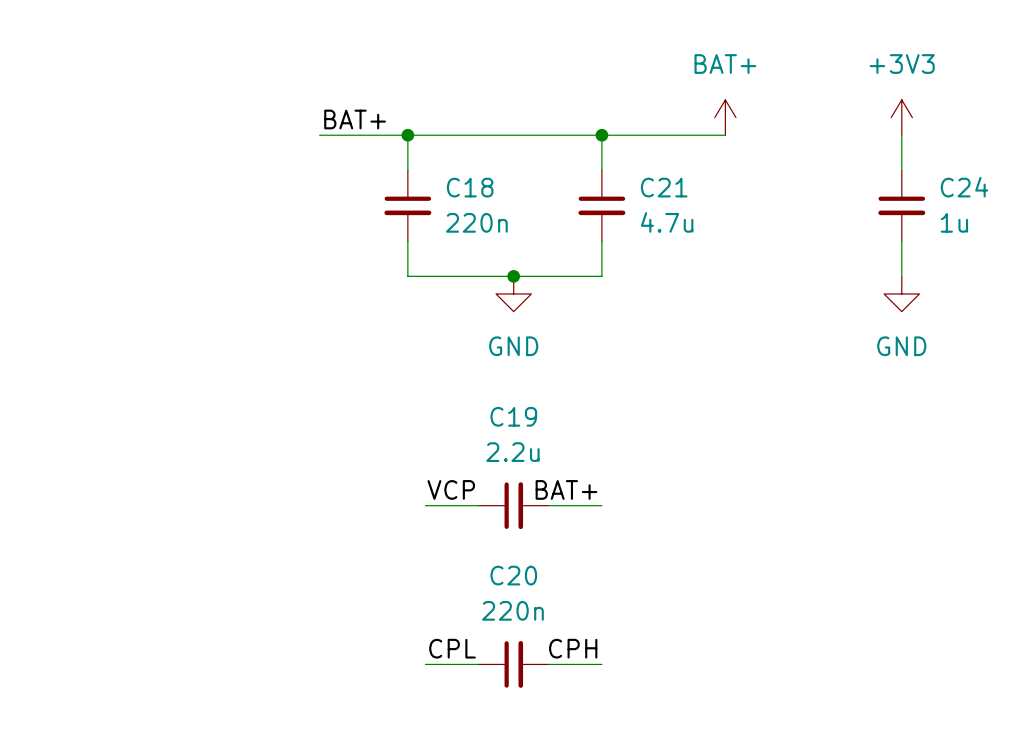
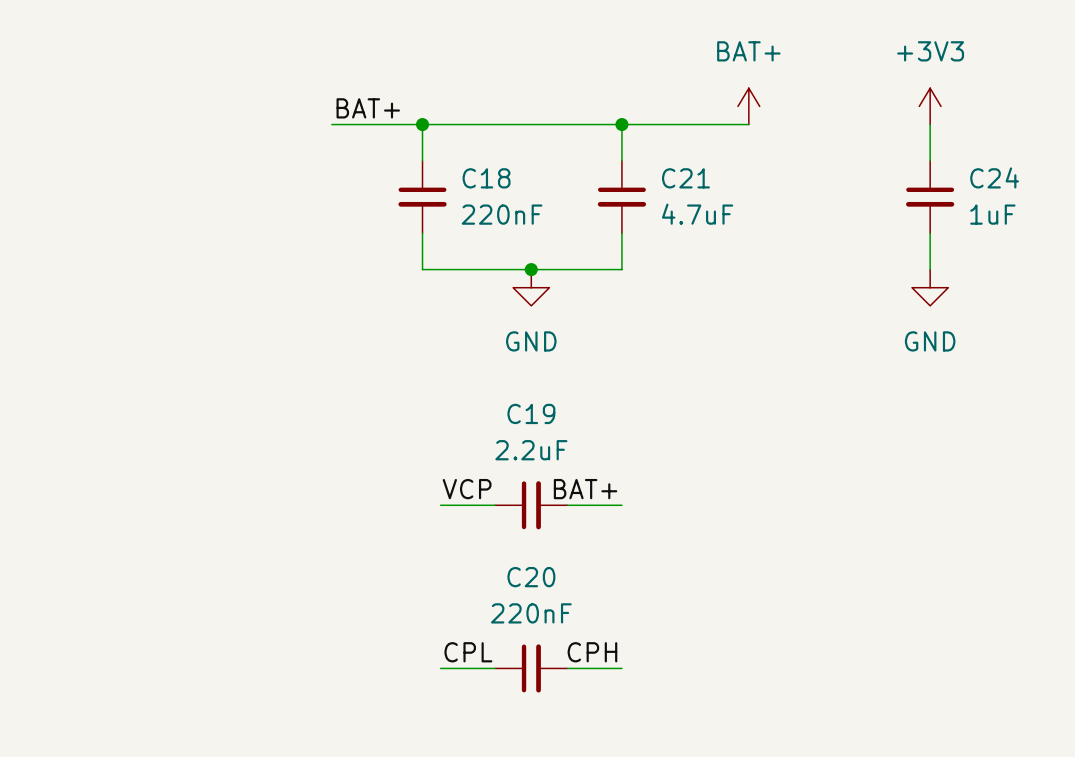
C18 value: 220n (476, 222) -> 220nF (502, 214)
C21 value: 4.7u (667, 222) -> 4.7uF (697, 214)
C24 value: 1u (954, 222) -> 1uF (992, 214)
C19 value: 2.2u (512, 452) -> 2.2uF (531, 450)
C20 value: 220n (512, 610) -> 220nF (531, 613)

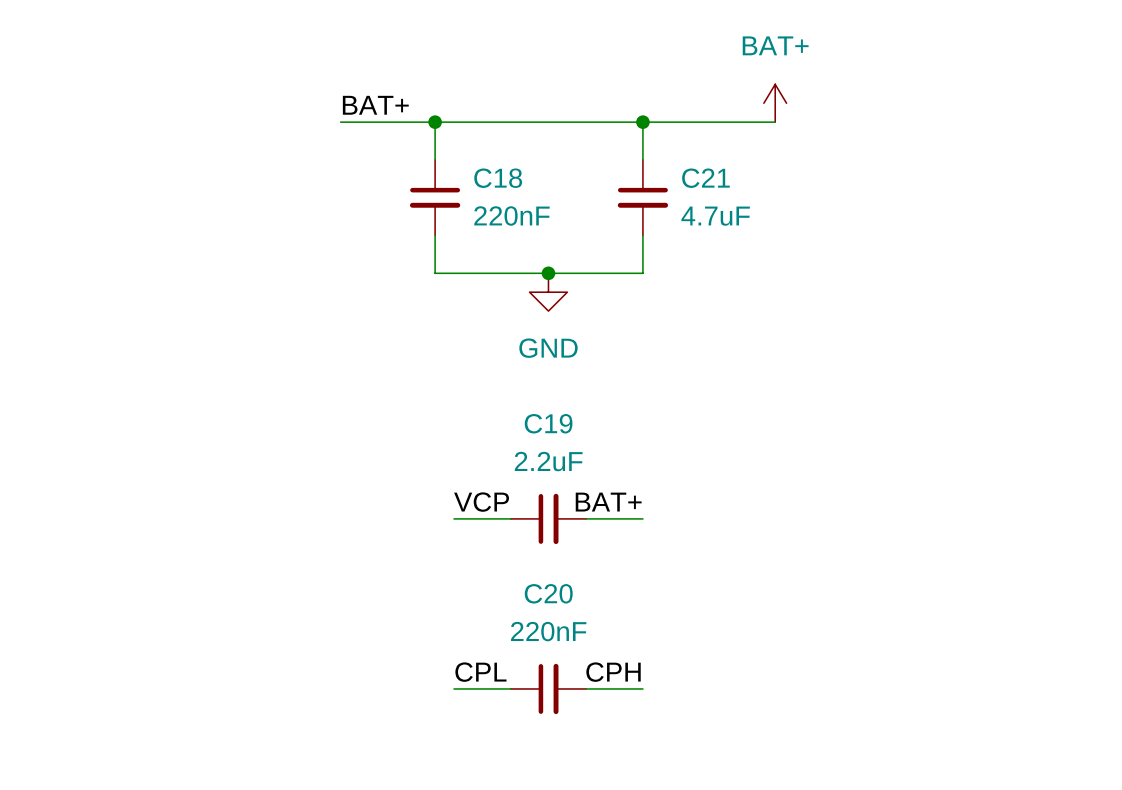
power symbol: +3V3 (930, 106) -> none
wire: (930, 124) (930, 160) -> none
C24: 1uF (930, 197) -> none
wire: (930, 233) (930, 269) -> none
power symbol: GND (930, 287) -> none

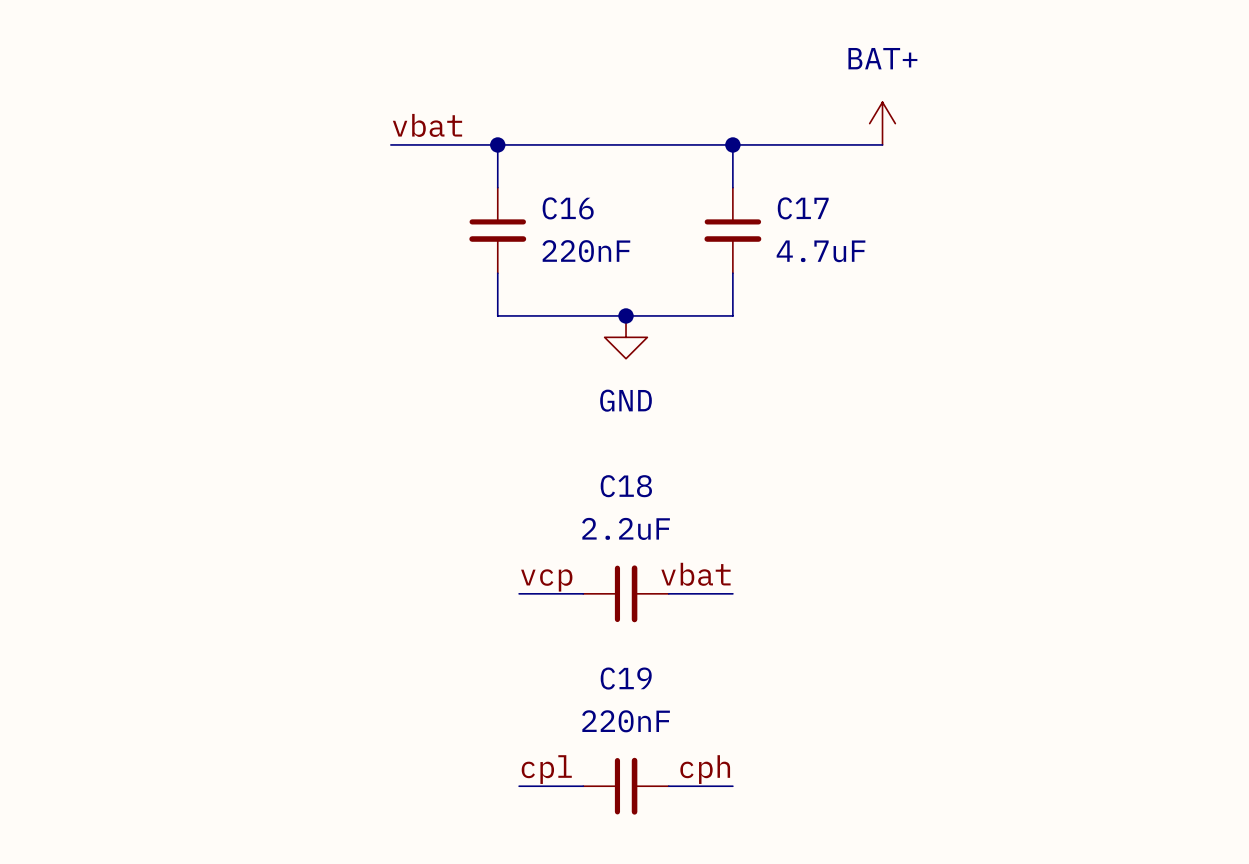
label: BAT+ (375, 105) -> vbat (427, 125)
C18 name: C18 (498, 178) -> C16 (568, 208)
C21 name: C21 (705, 178) -> C17 (803, 208)
C19 name: C19 (548, 423) -> C18 (626, 486)
label: VCP (481, 502) -> vcp (546, 580)
label: BAT+ (608, 502) -> vbat (695, 574)
C20 name: C20 (548, 593) -> C19 (626, 678)
label: CPL (480, 672) -> cpl (546, 769)
label: CPH (613, 672) -> cph (705, 769)

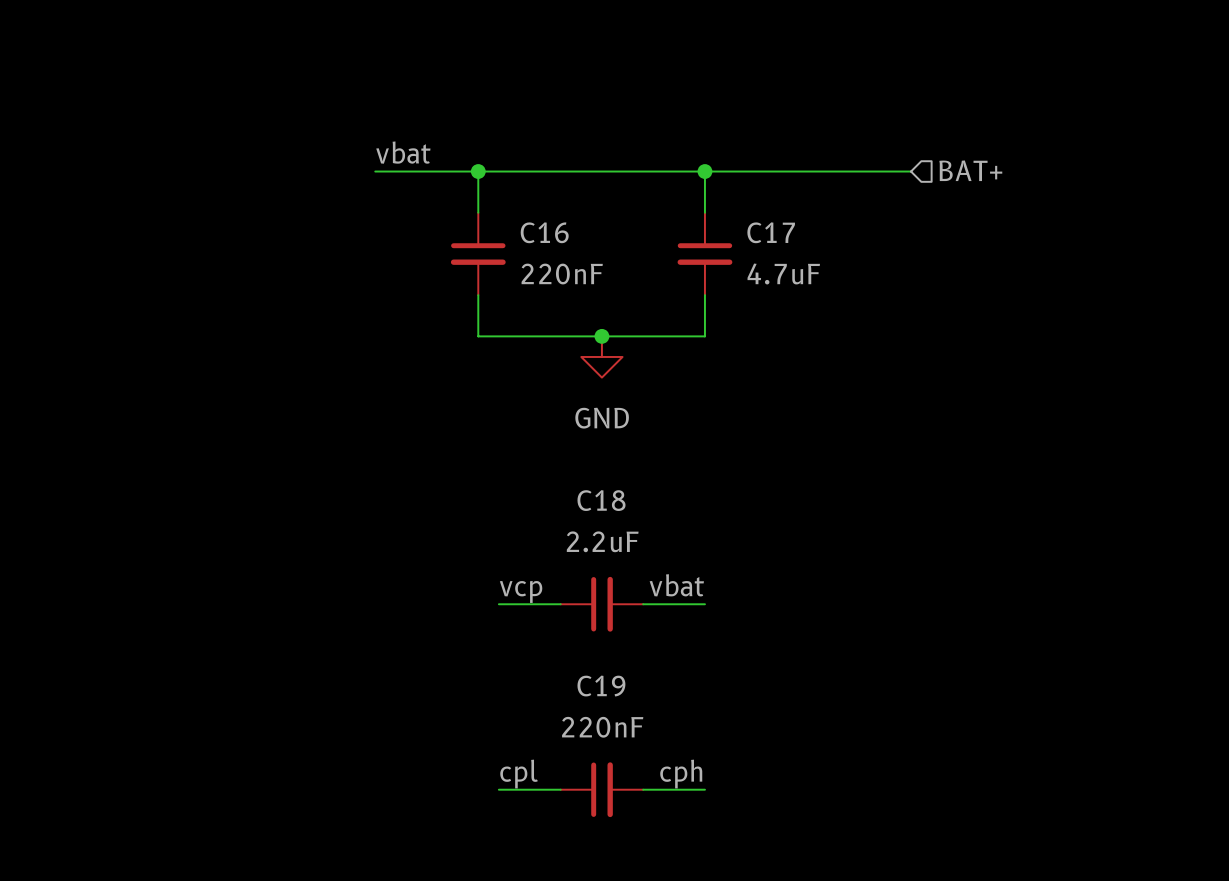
power symbol: BAT+ (882, 123) -> none
wire: none -> (849, 171) (911, 171)
hierarchical label: none -> BAT+ (970, 170)

